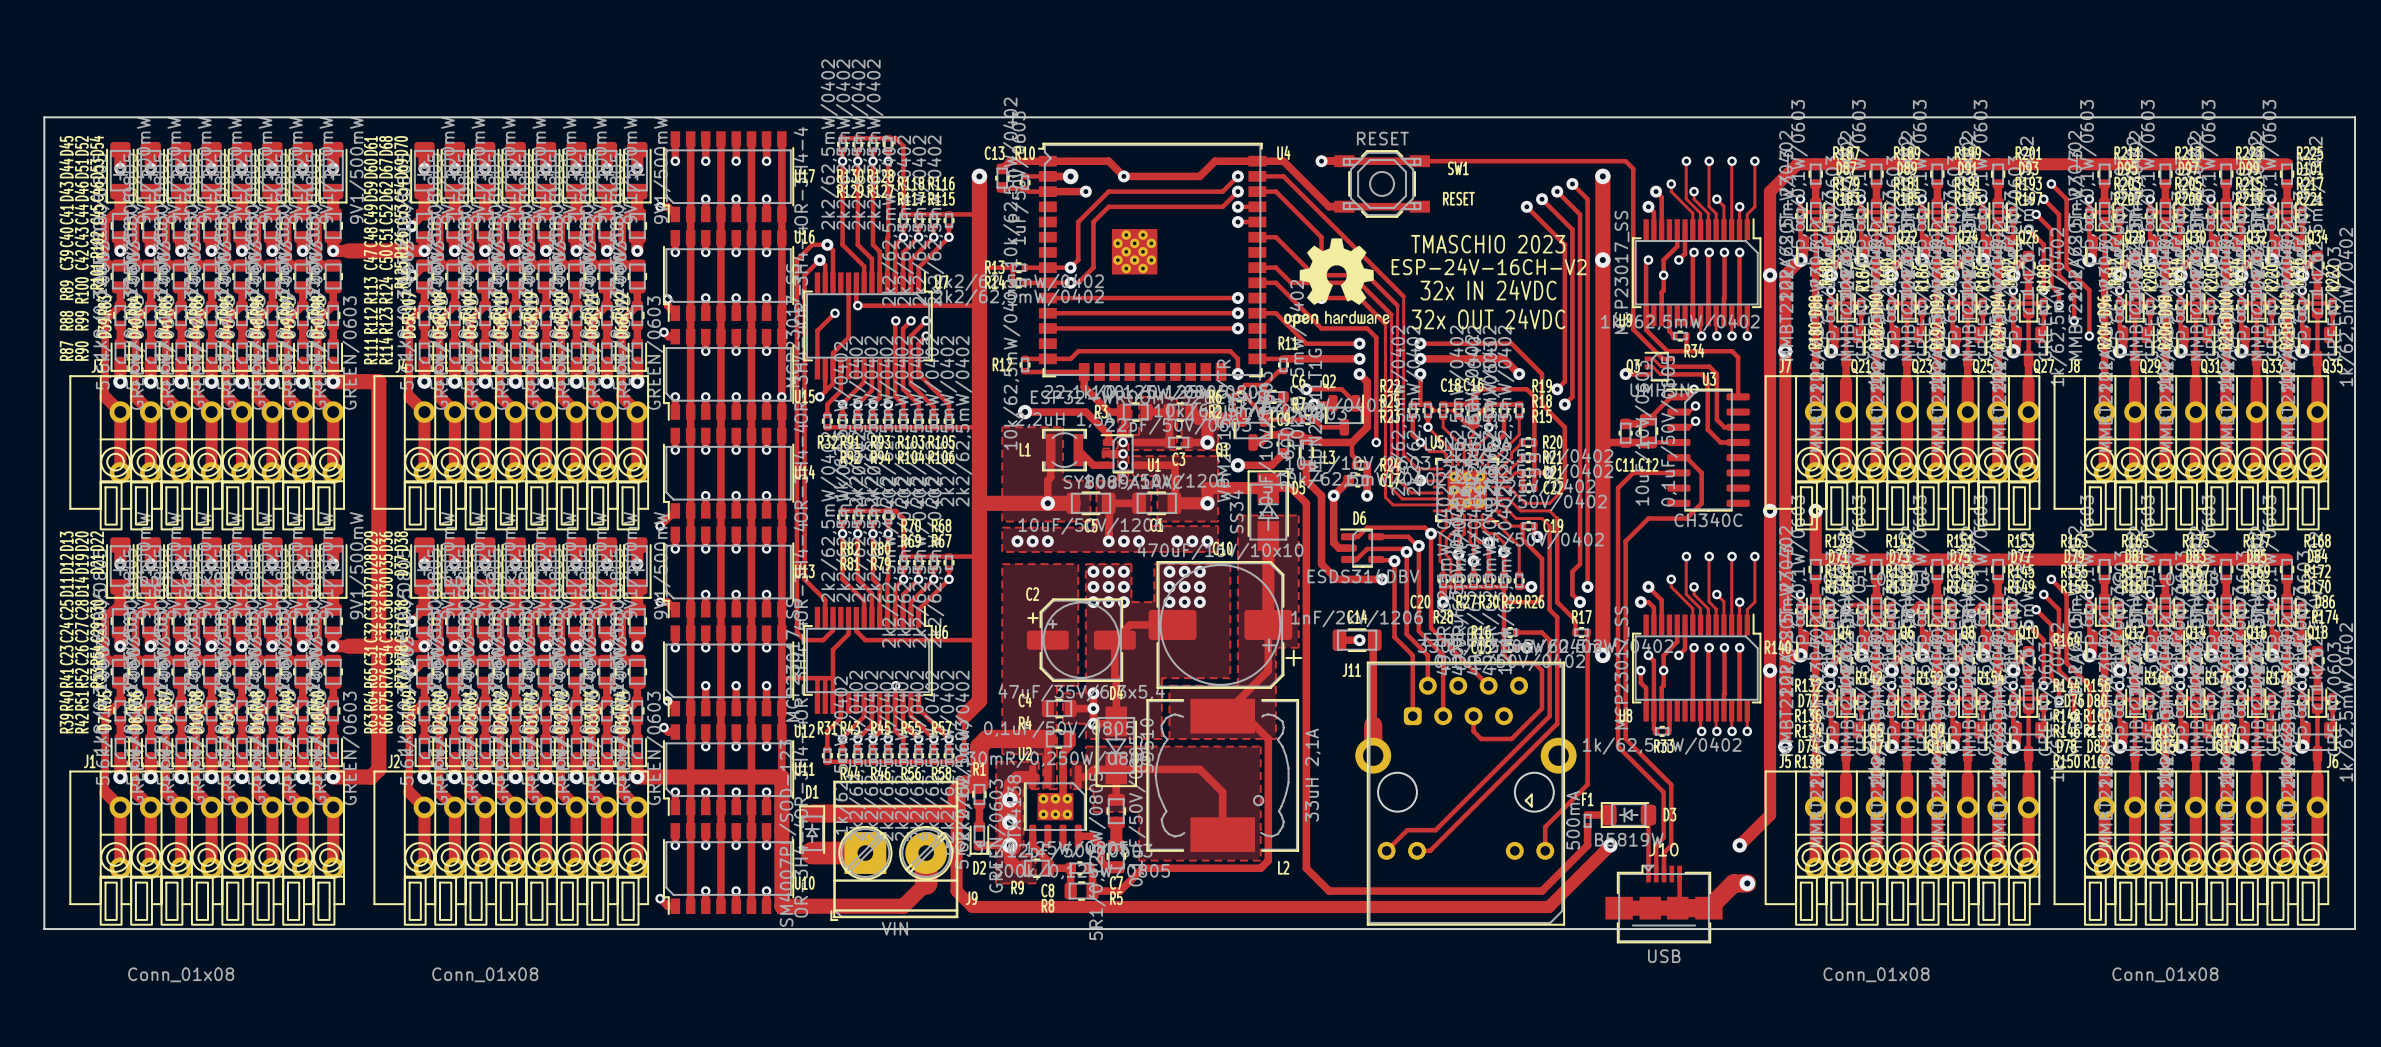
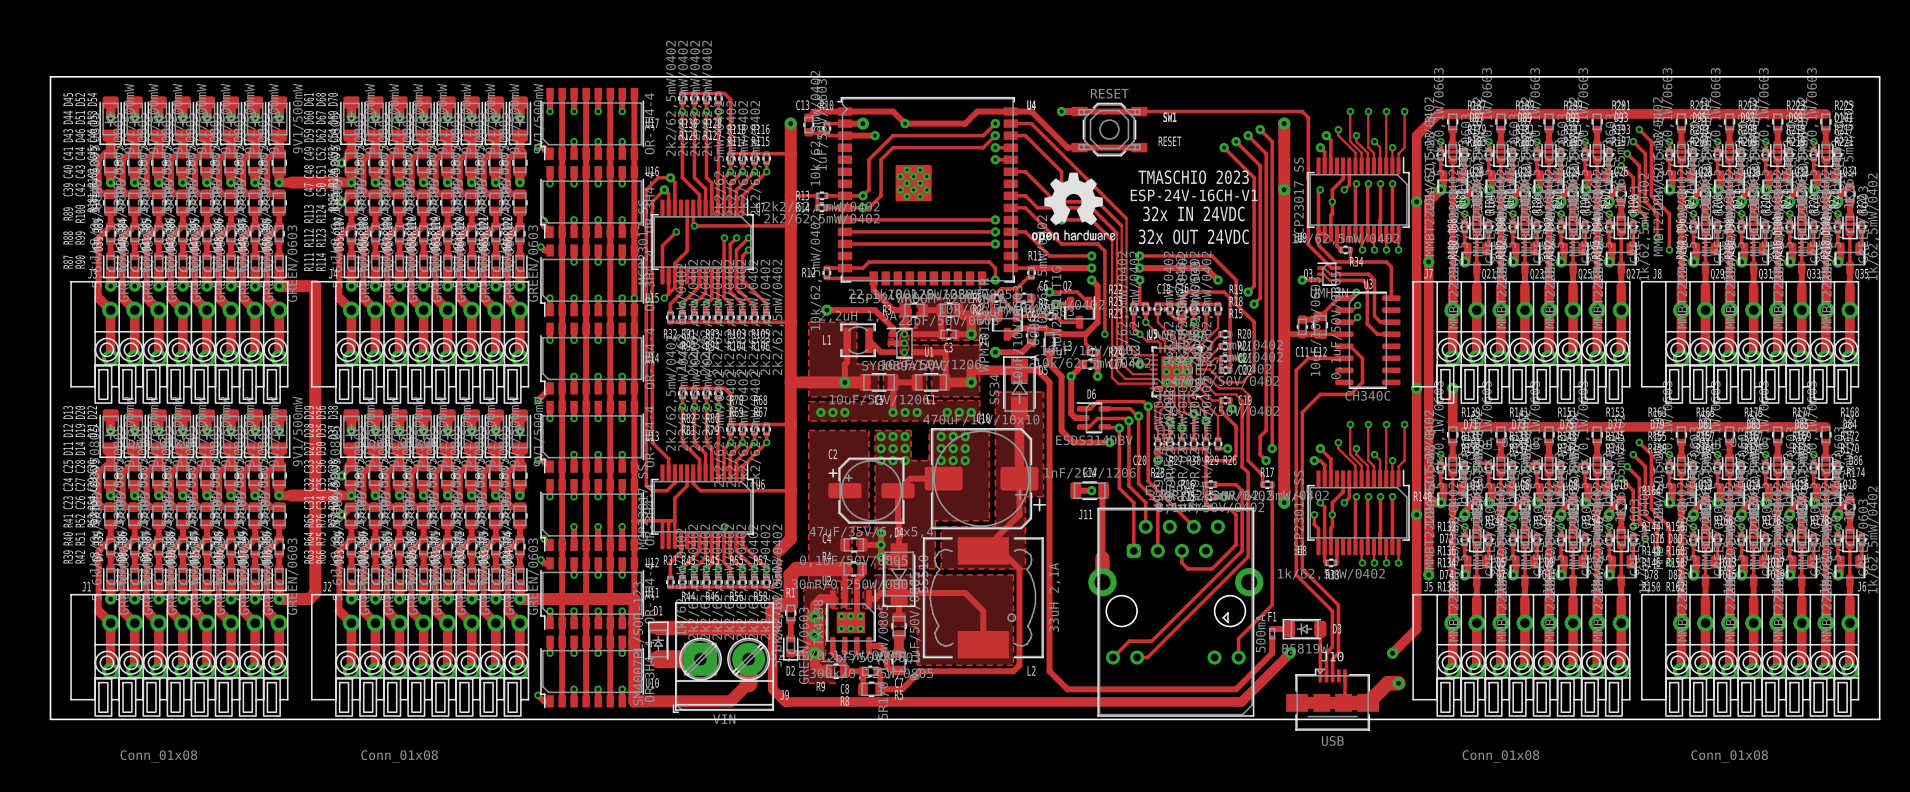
text: ESP-24V-16CH-V2 (1489, 266) -> ESP-24V-16CH-V1 (1194, 195)

